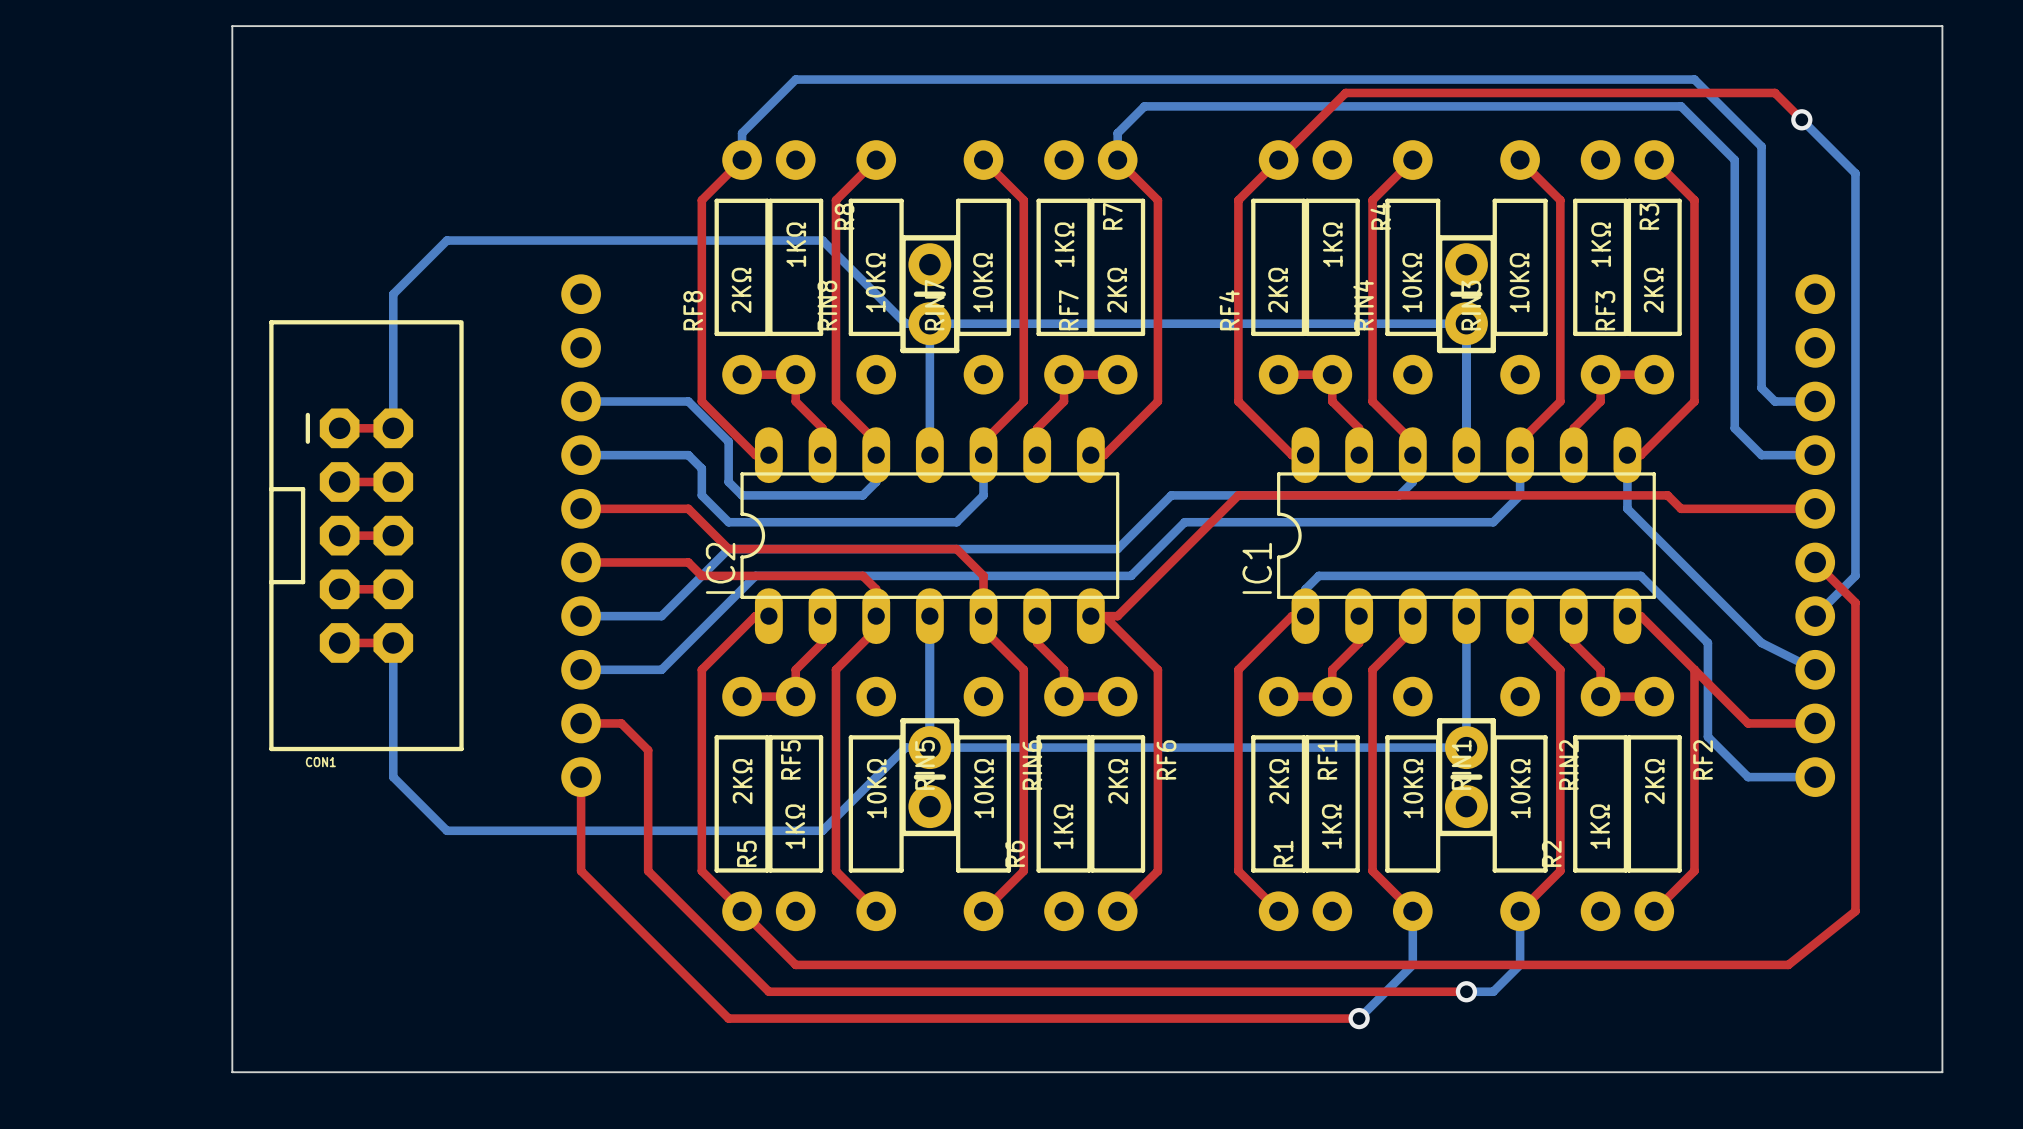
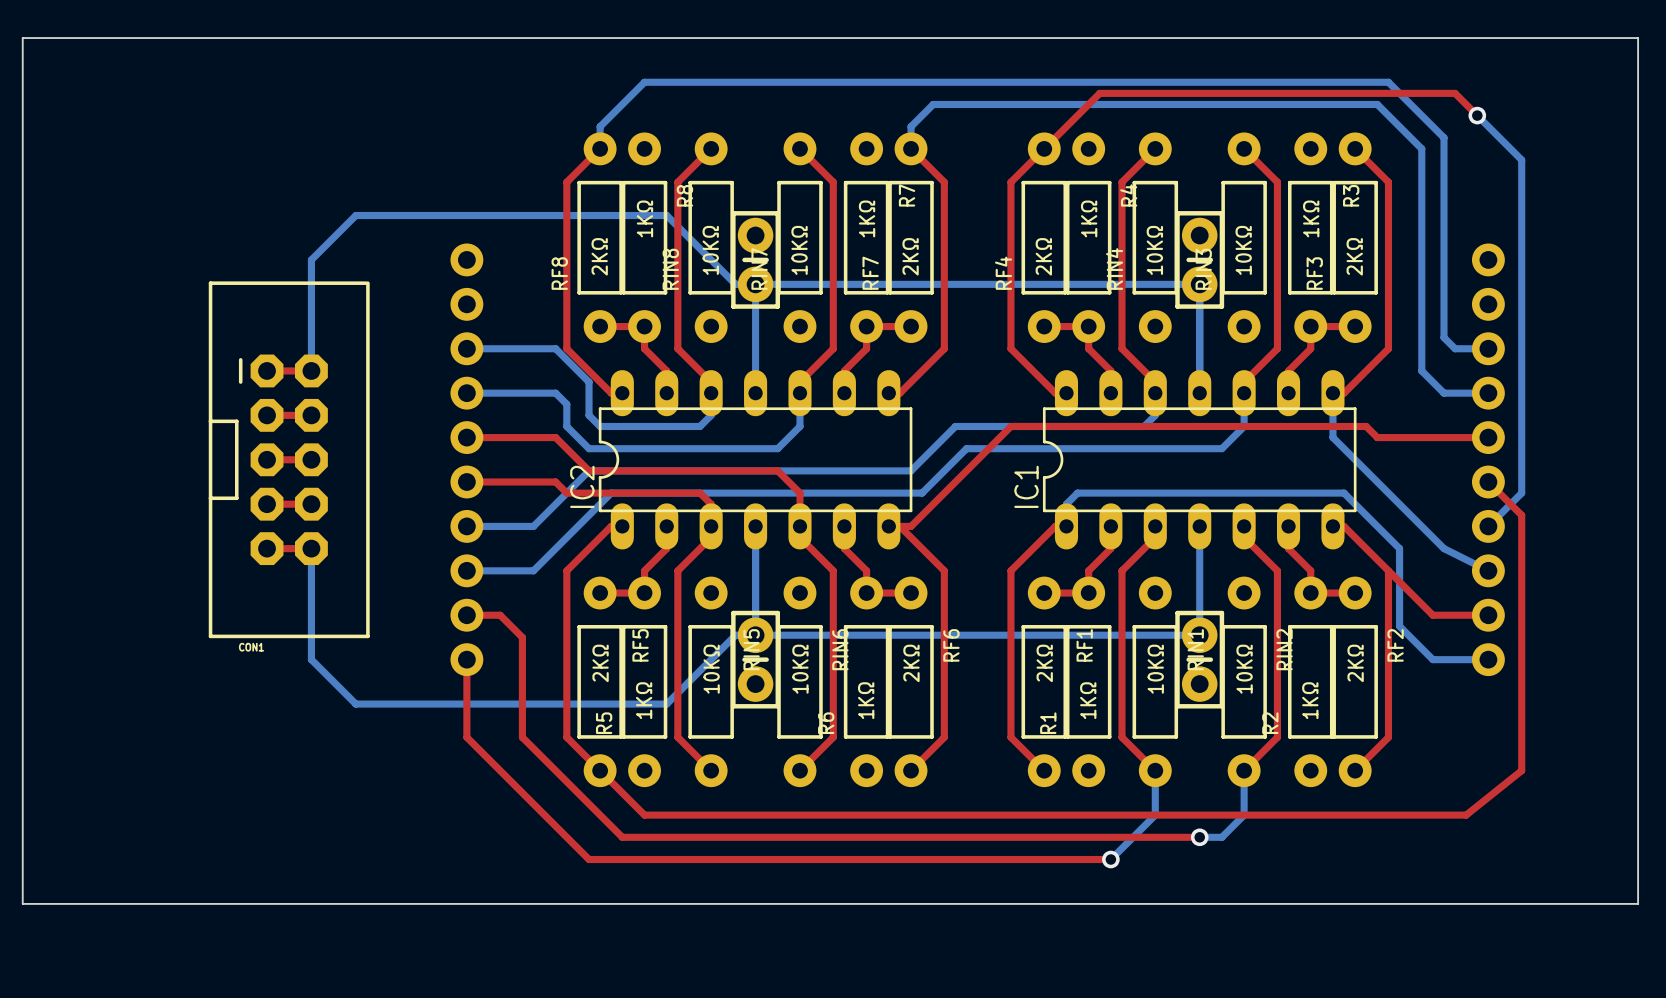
board edge: (232, 26) (232, 1072) -> (178, 38) (22, 38) (22, 903) (178, 903)
board edge: (1942, 26) (1942, 1072) -> (1593, 38) (1638, 38) (1638, 903) (1593, 903)

